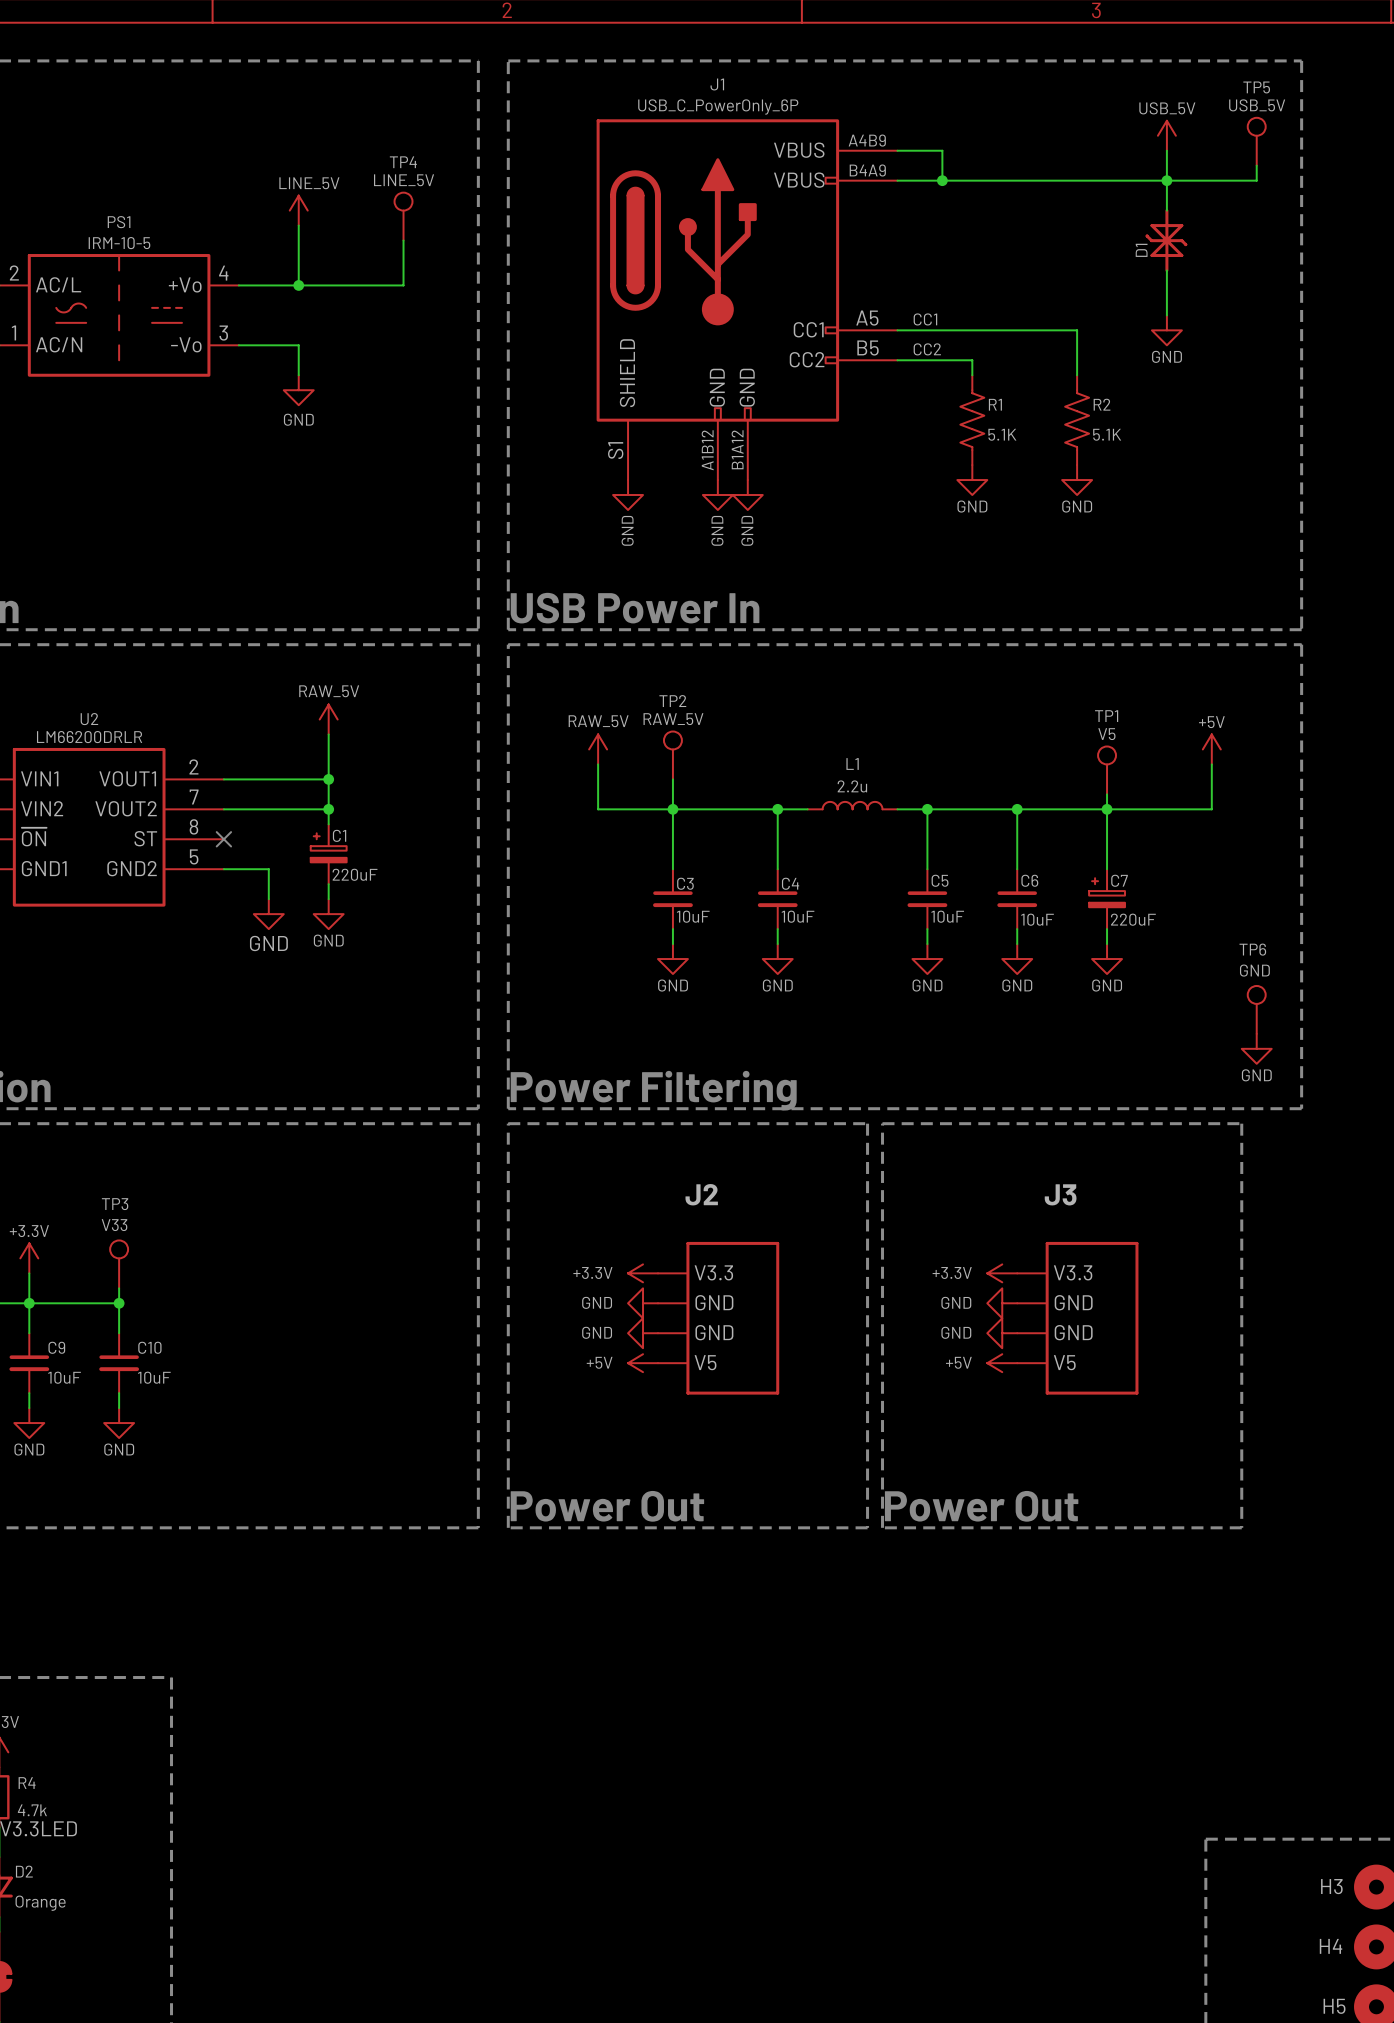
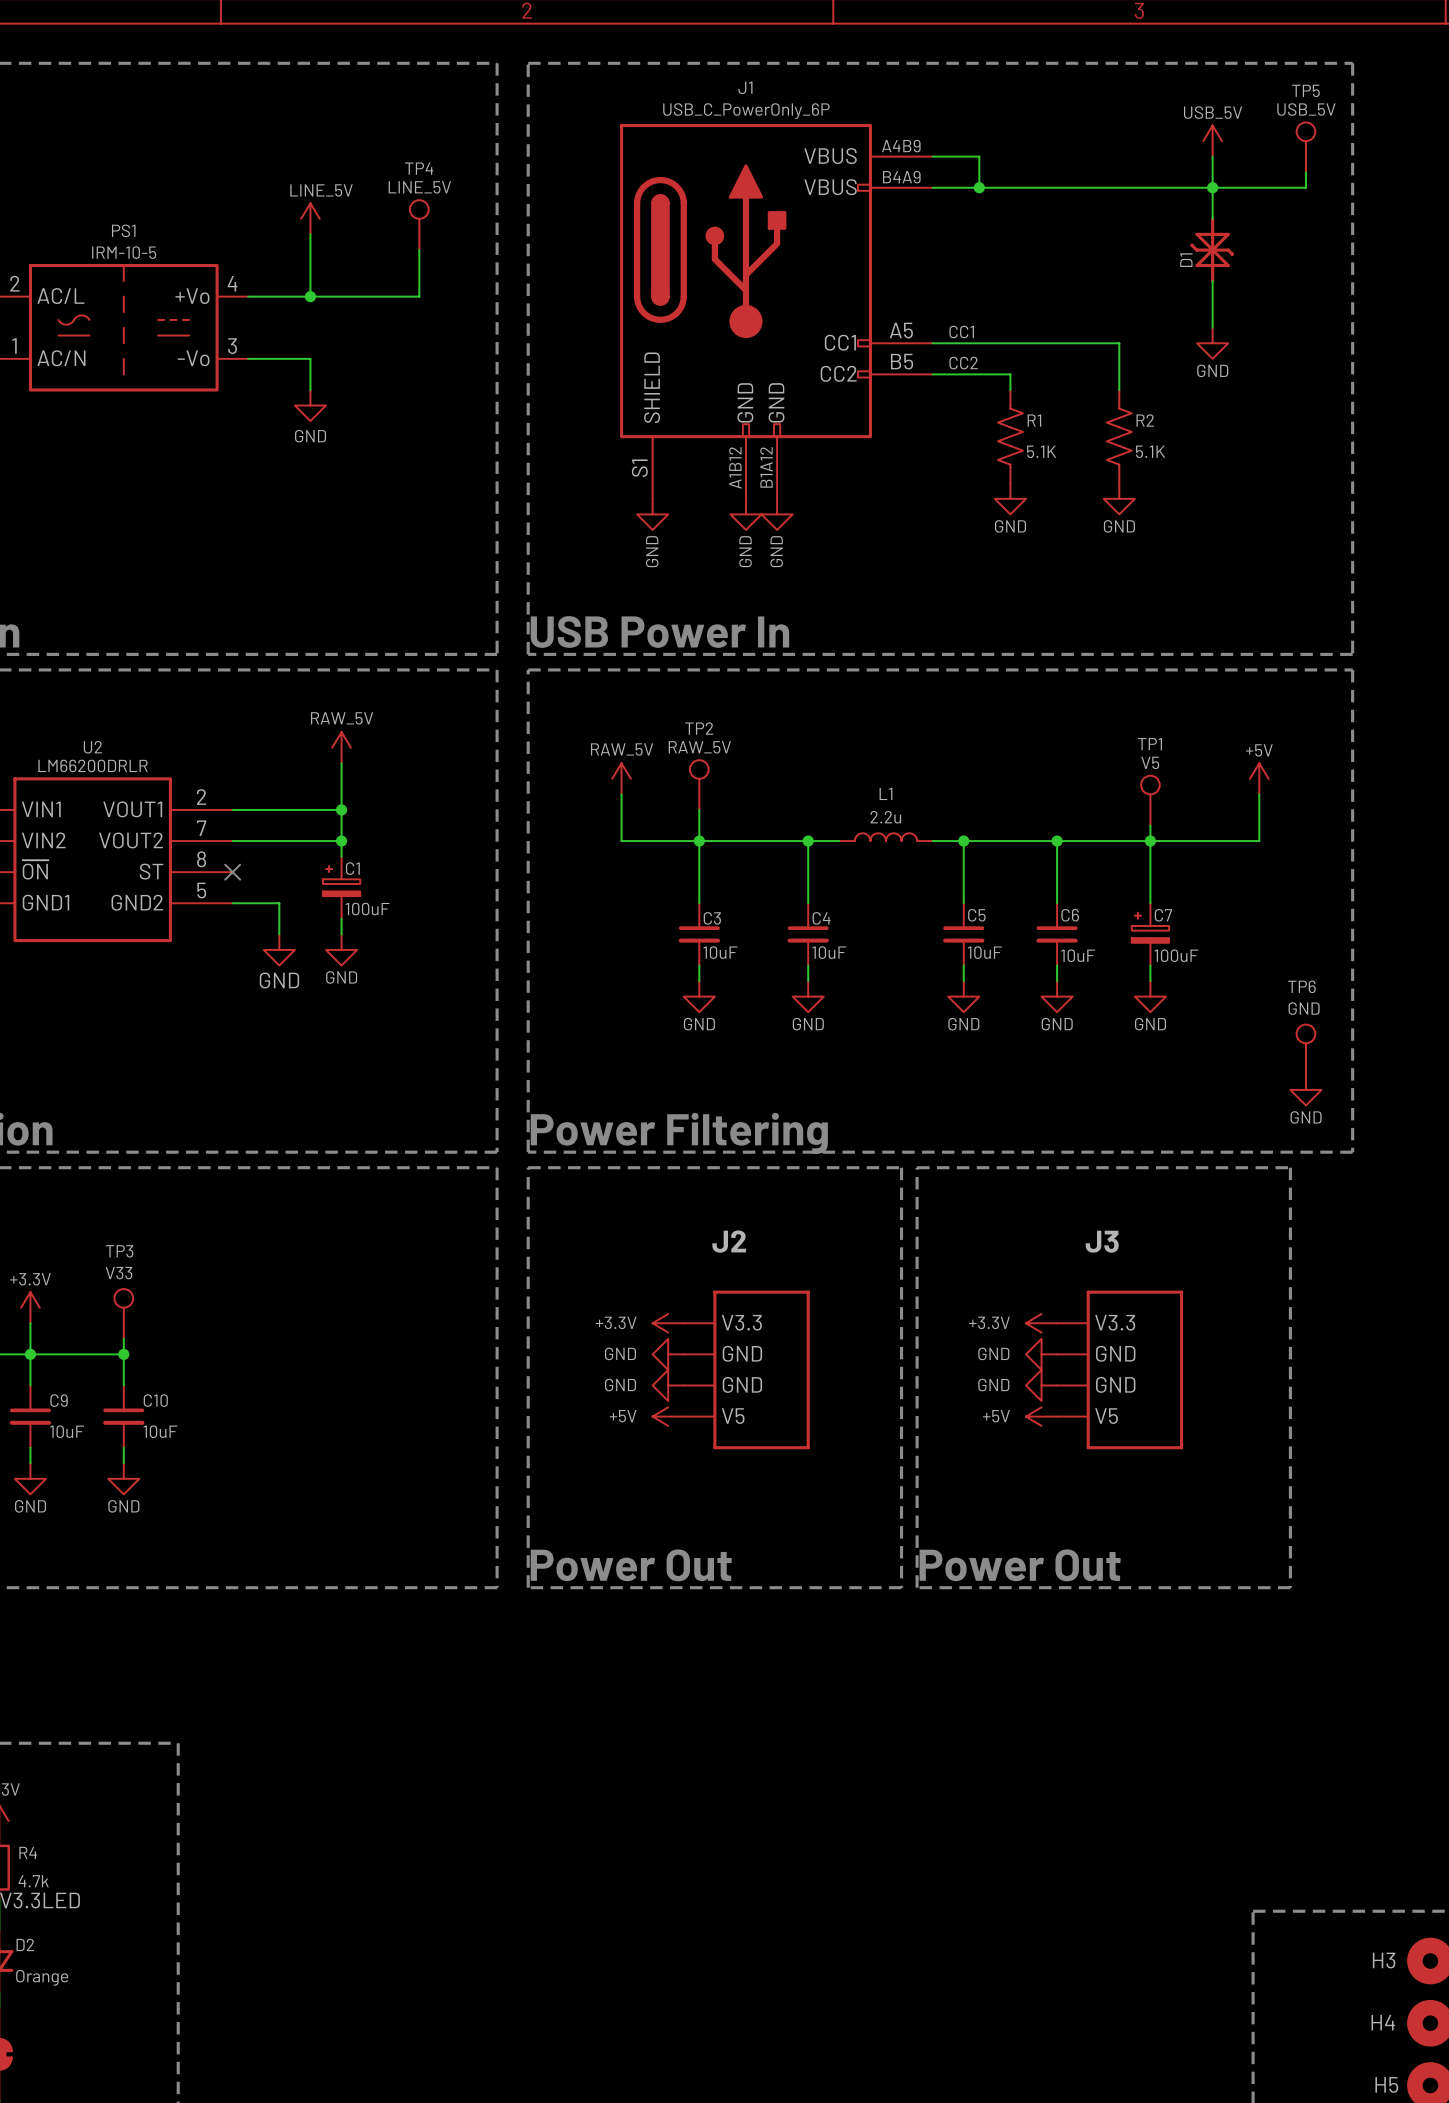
C1 value: 220uF (355, 874) -> 100uF (367, 909)
C7 value: 220uF (1133, 919) -> 100uF (1176, 955)

